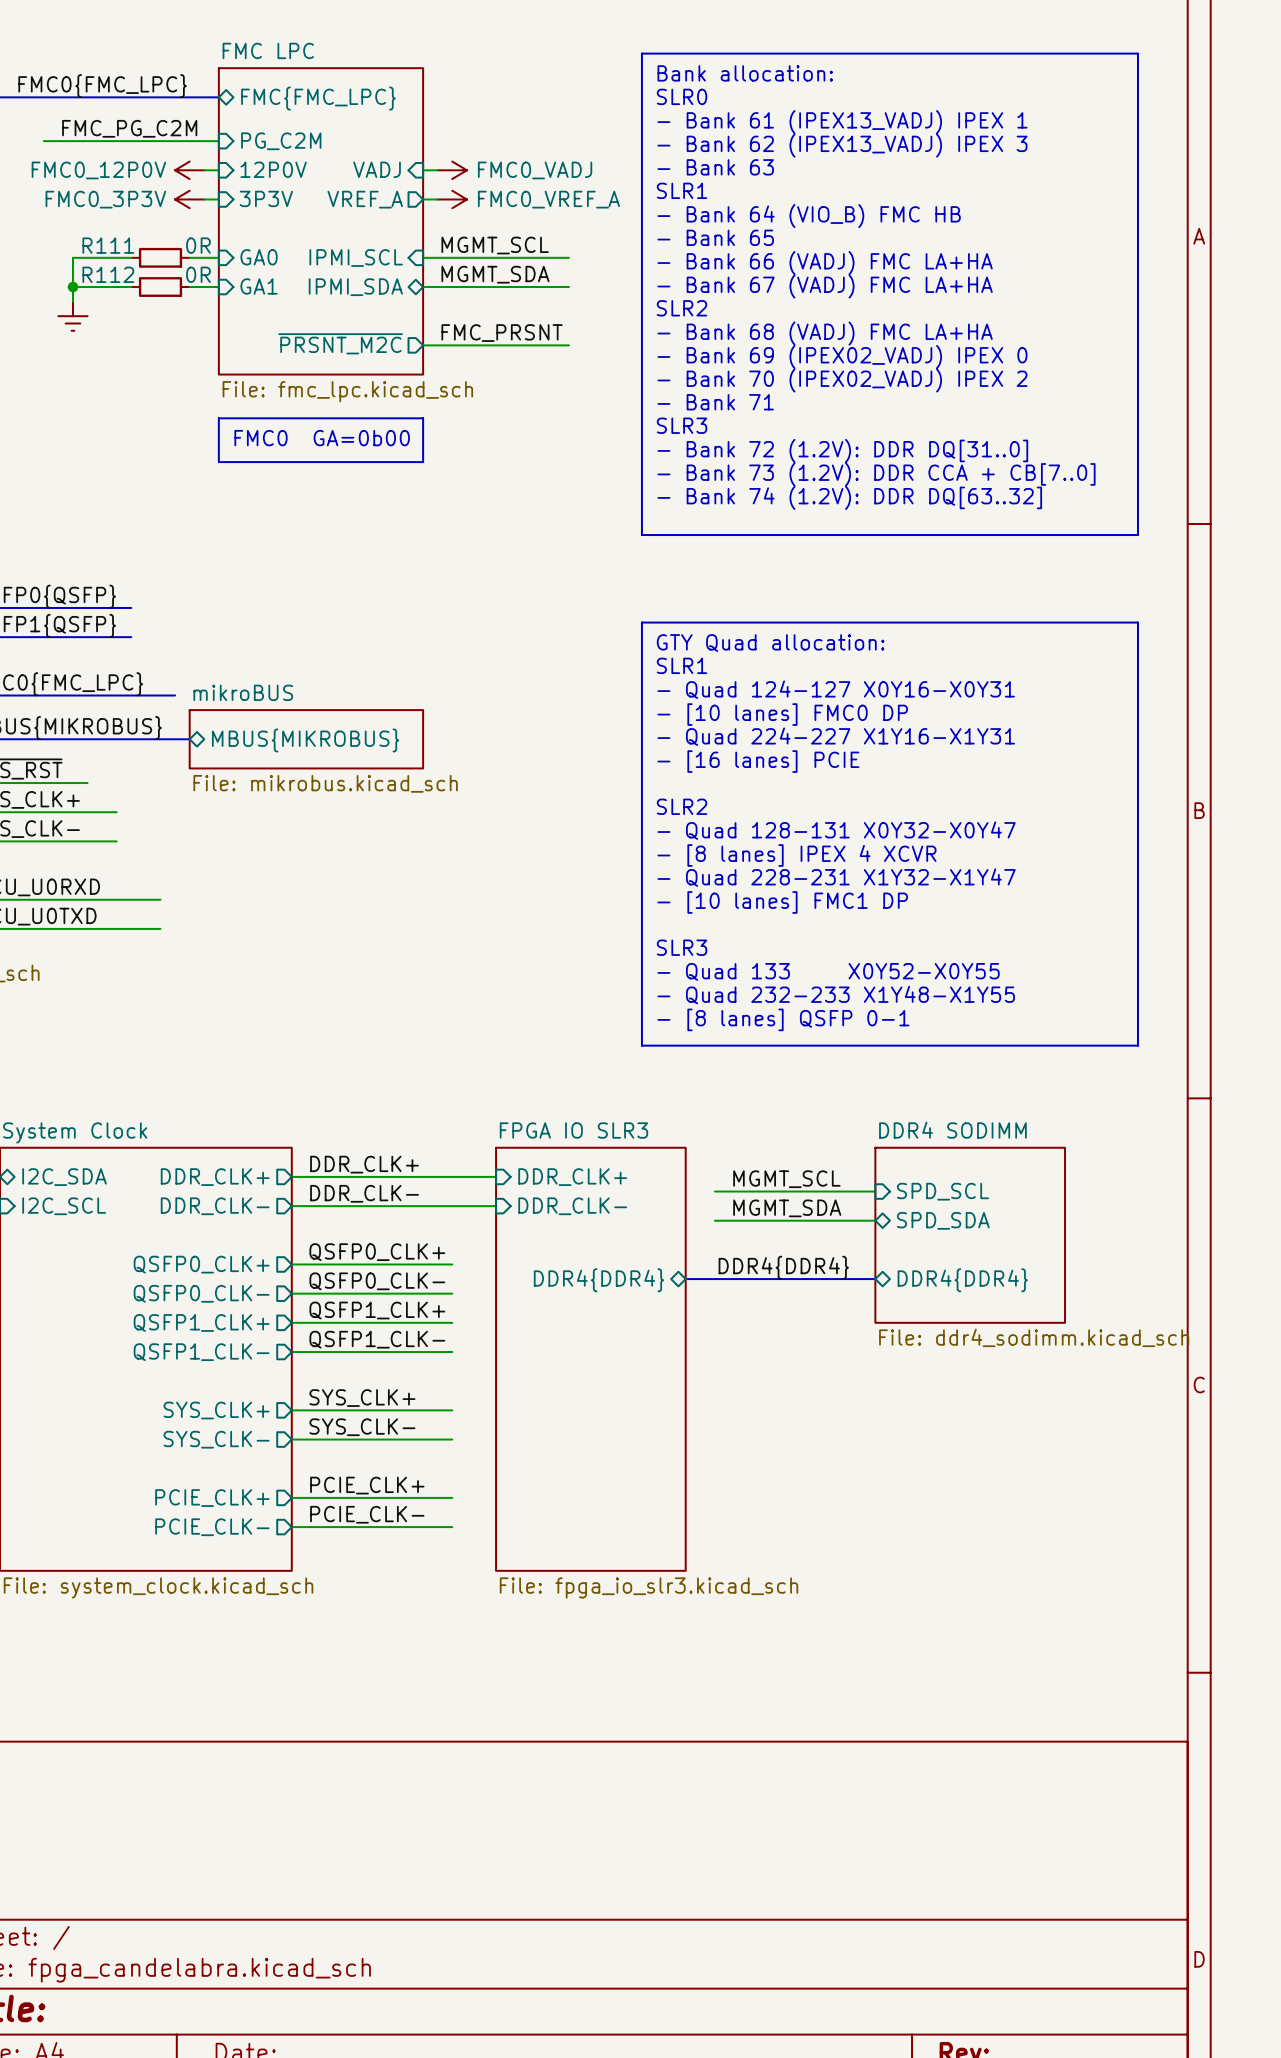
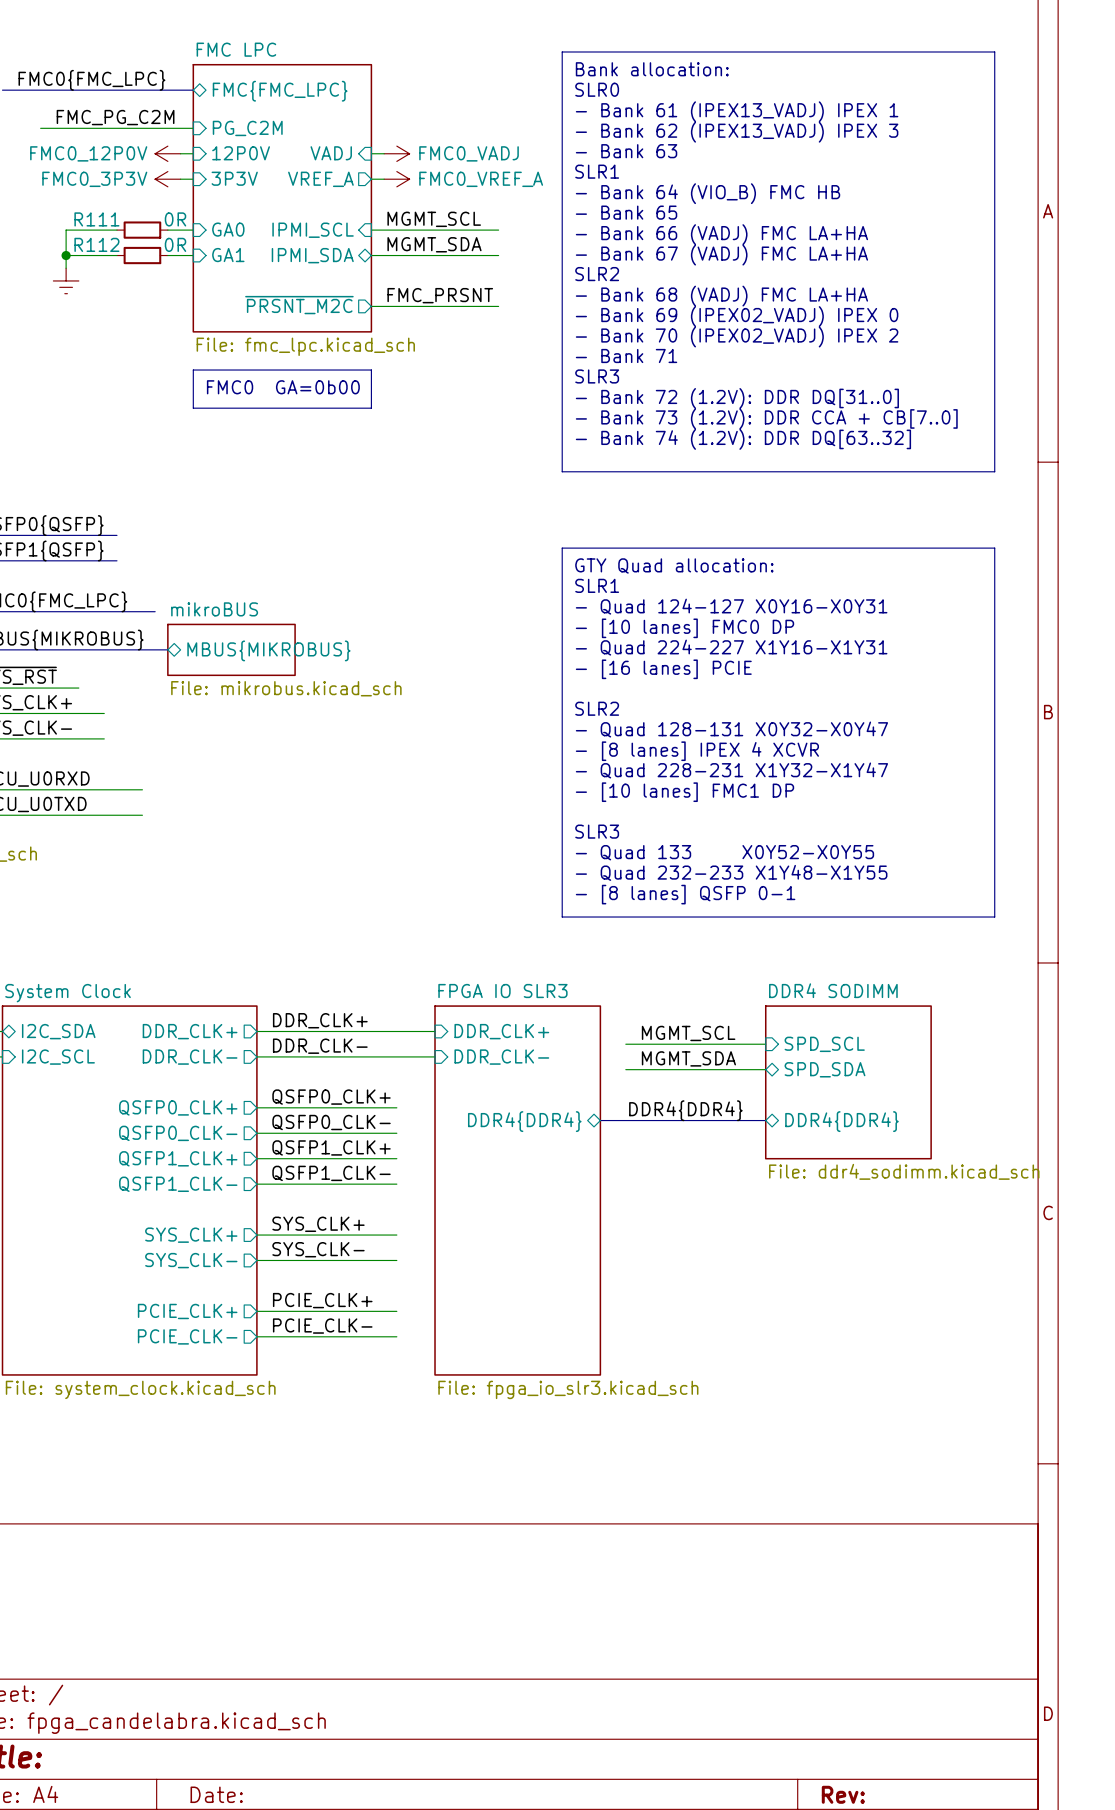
sheet mikroBUS: none -> File: mikrobus.kicad_sch (231, 649)
sheet mikroBUS: File: mikrobus.kicad_sch (306, 739) -> none

